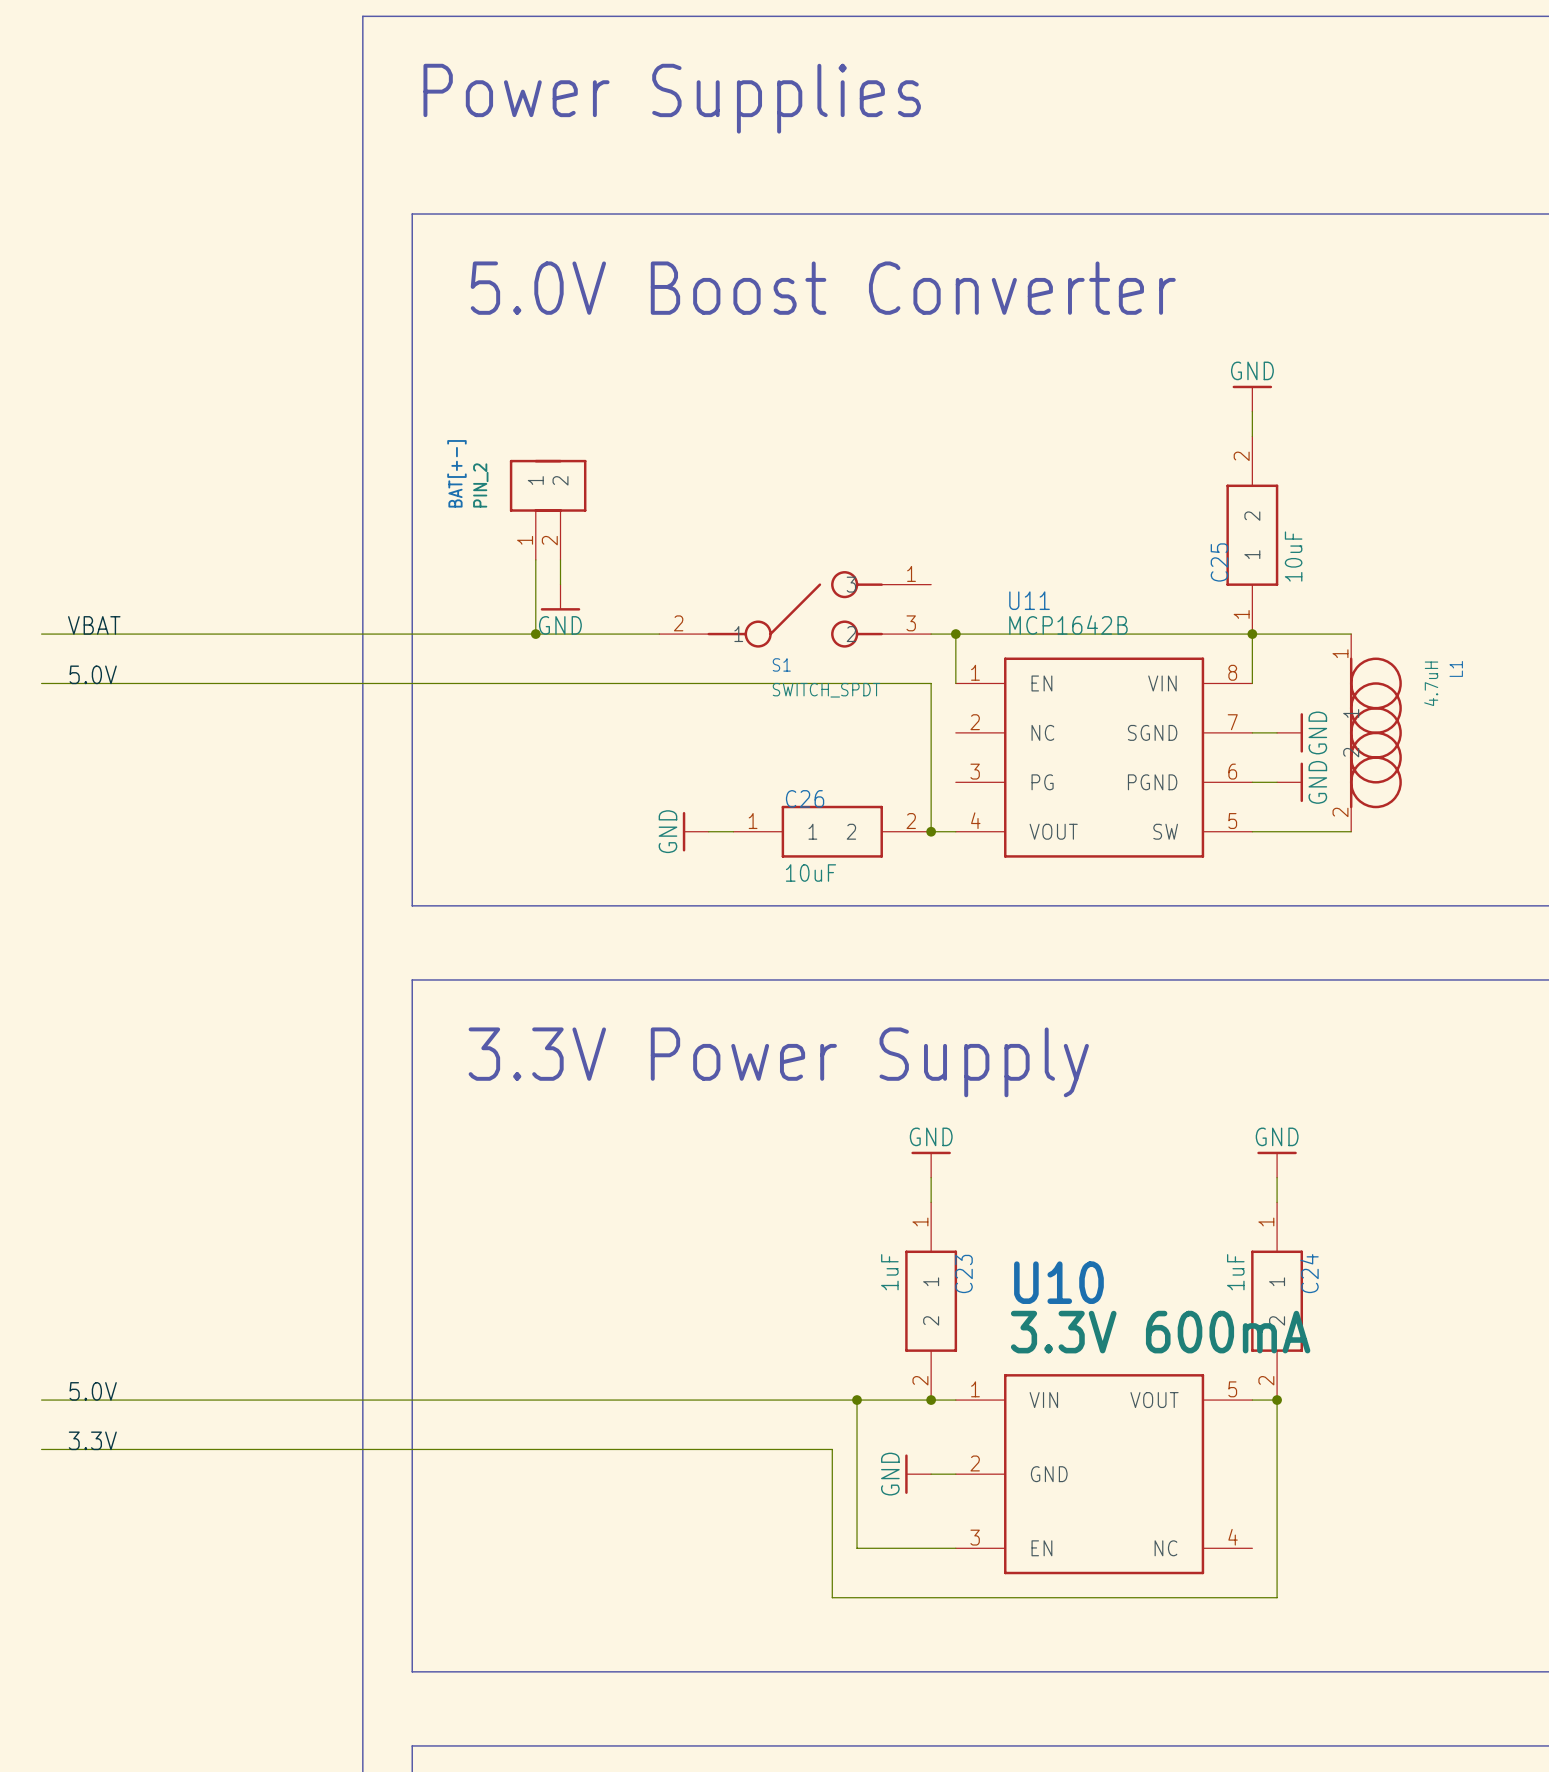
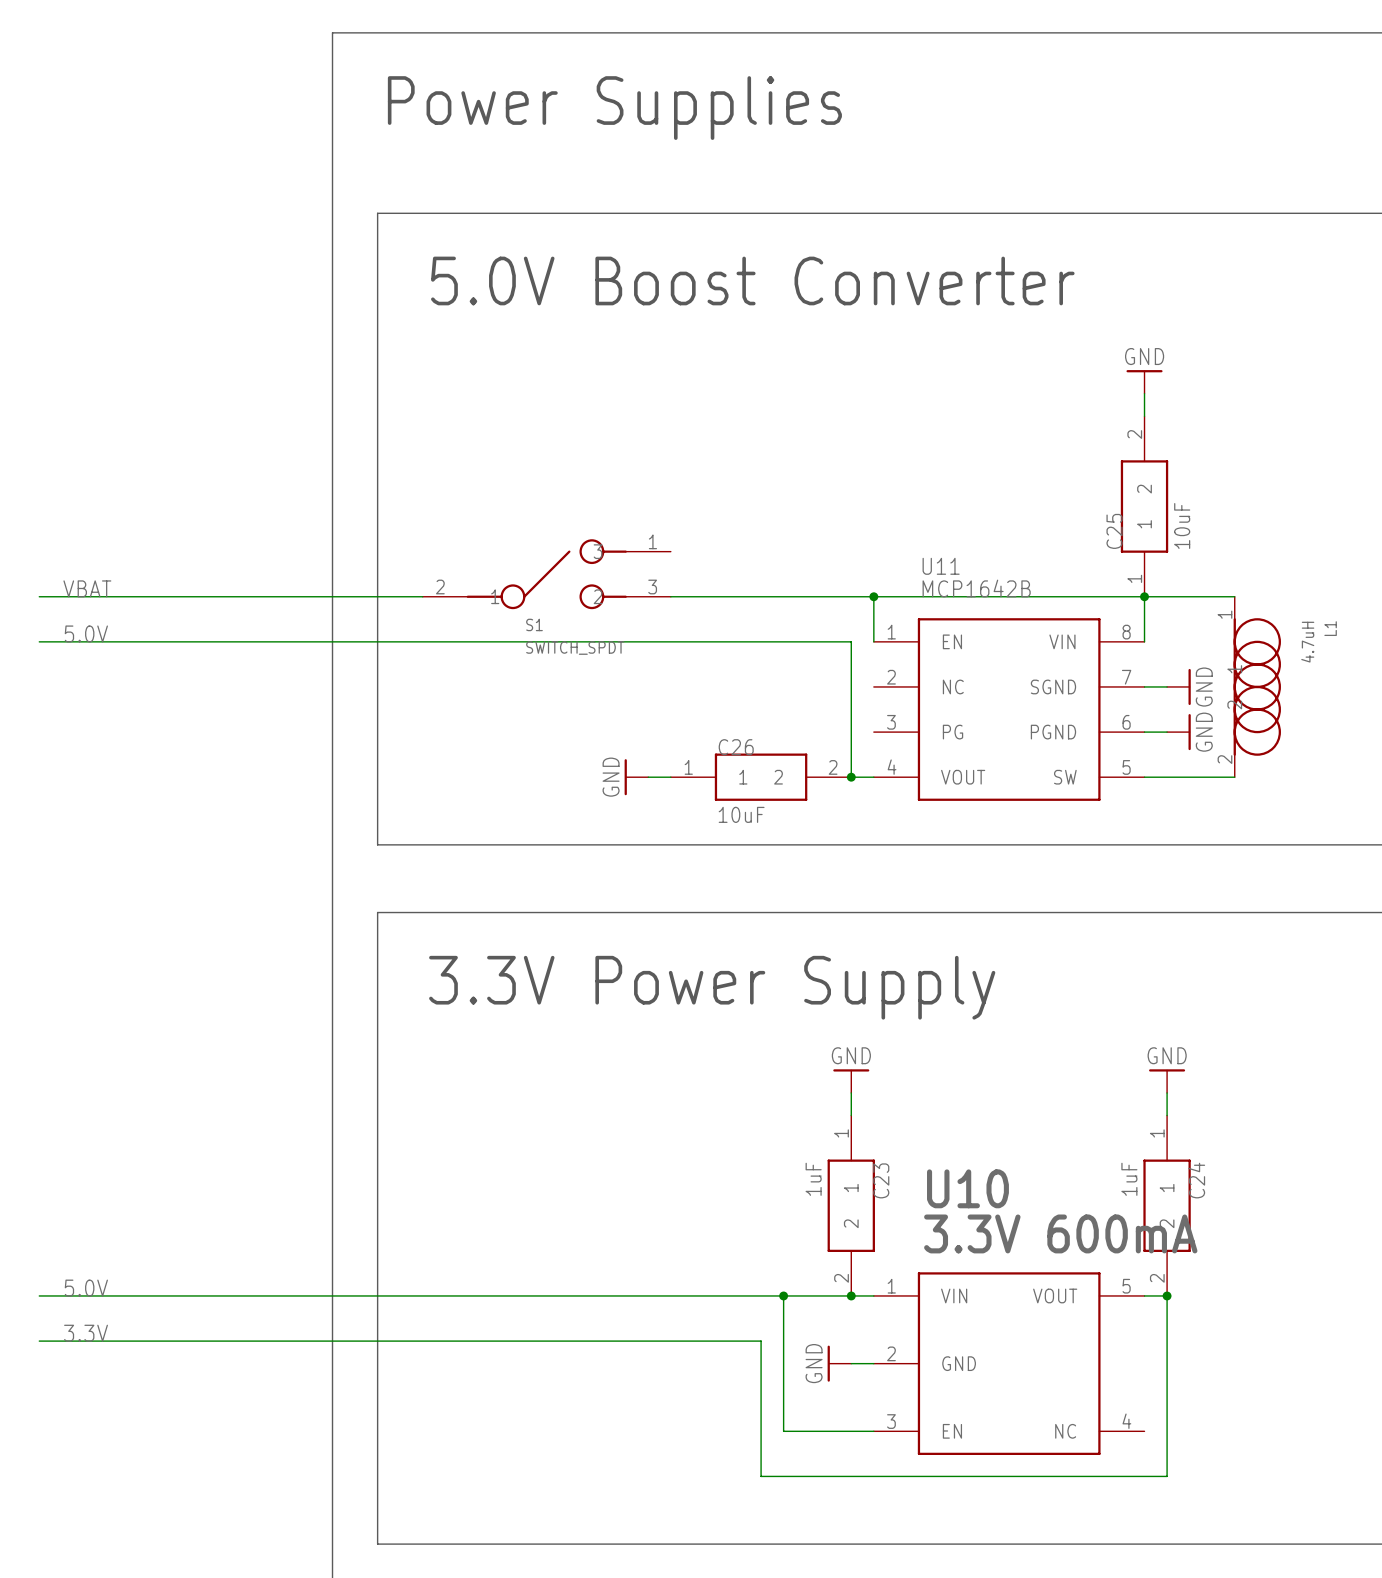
BAT[+-]: PIN_2 (548, 509) -> none
wire: (535, 559) (535, 634) -> none
wire: (560, 559) (560, 584) -> none
power symbol: GND (560, 597) -> none
S1 position: (795, 609) -> (546, 574)
wire: (461, 634) (659, 634) -> none
junction: (535, 634) -> none
wire: none -> (670, 596) (851, 596)

